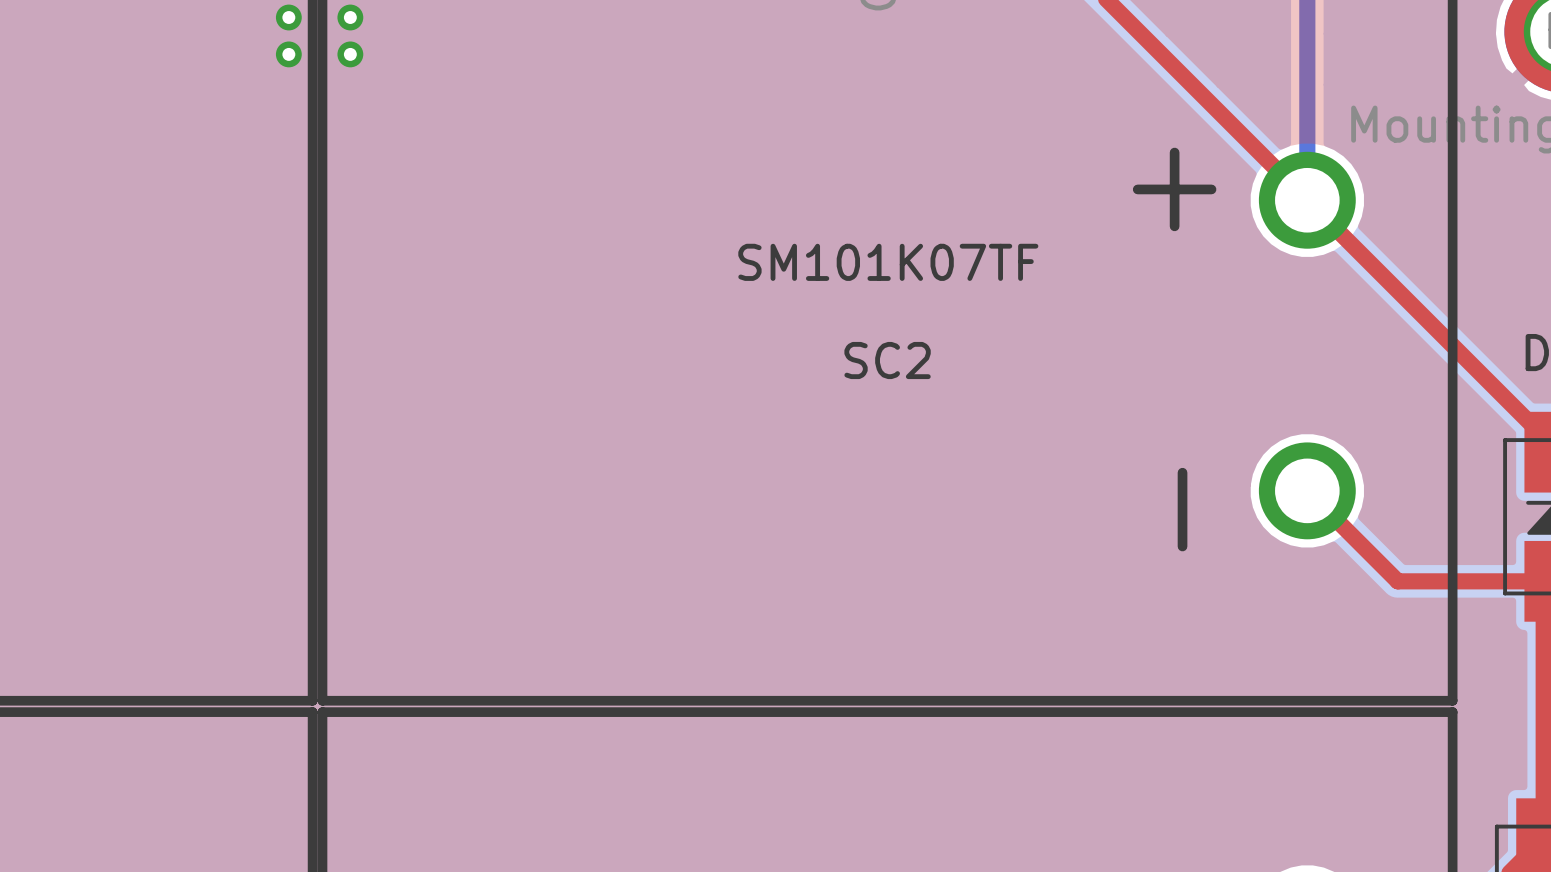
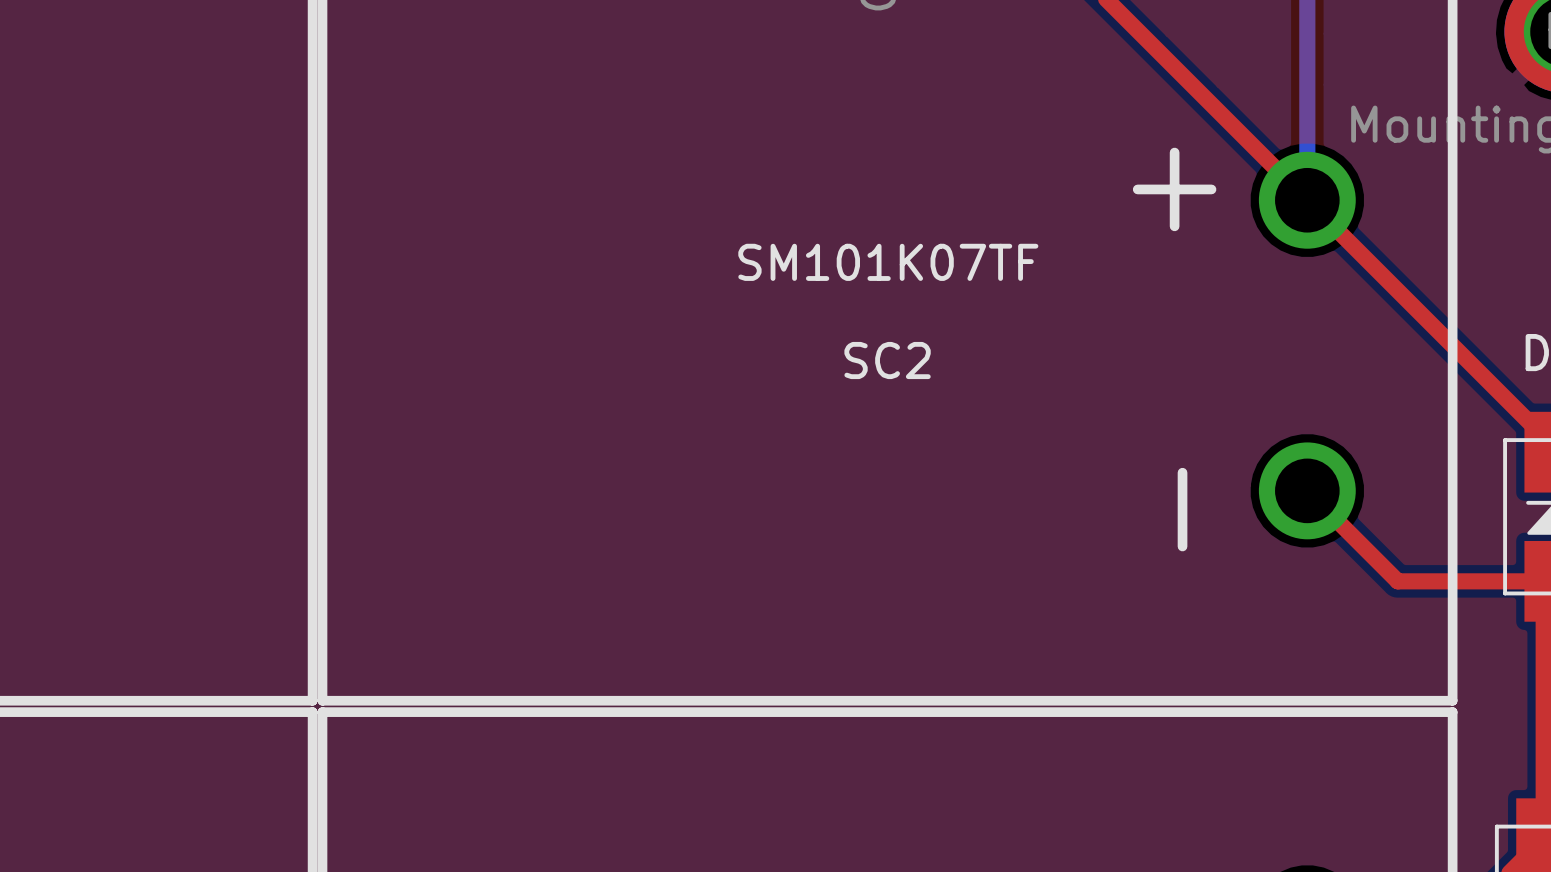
via: (288, 17) -> none
via: (350, 17) -> none
via: (288, 54) -> none
via: (350, 54) -> none

